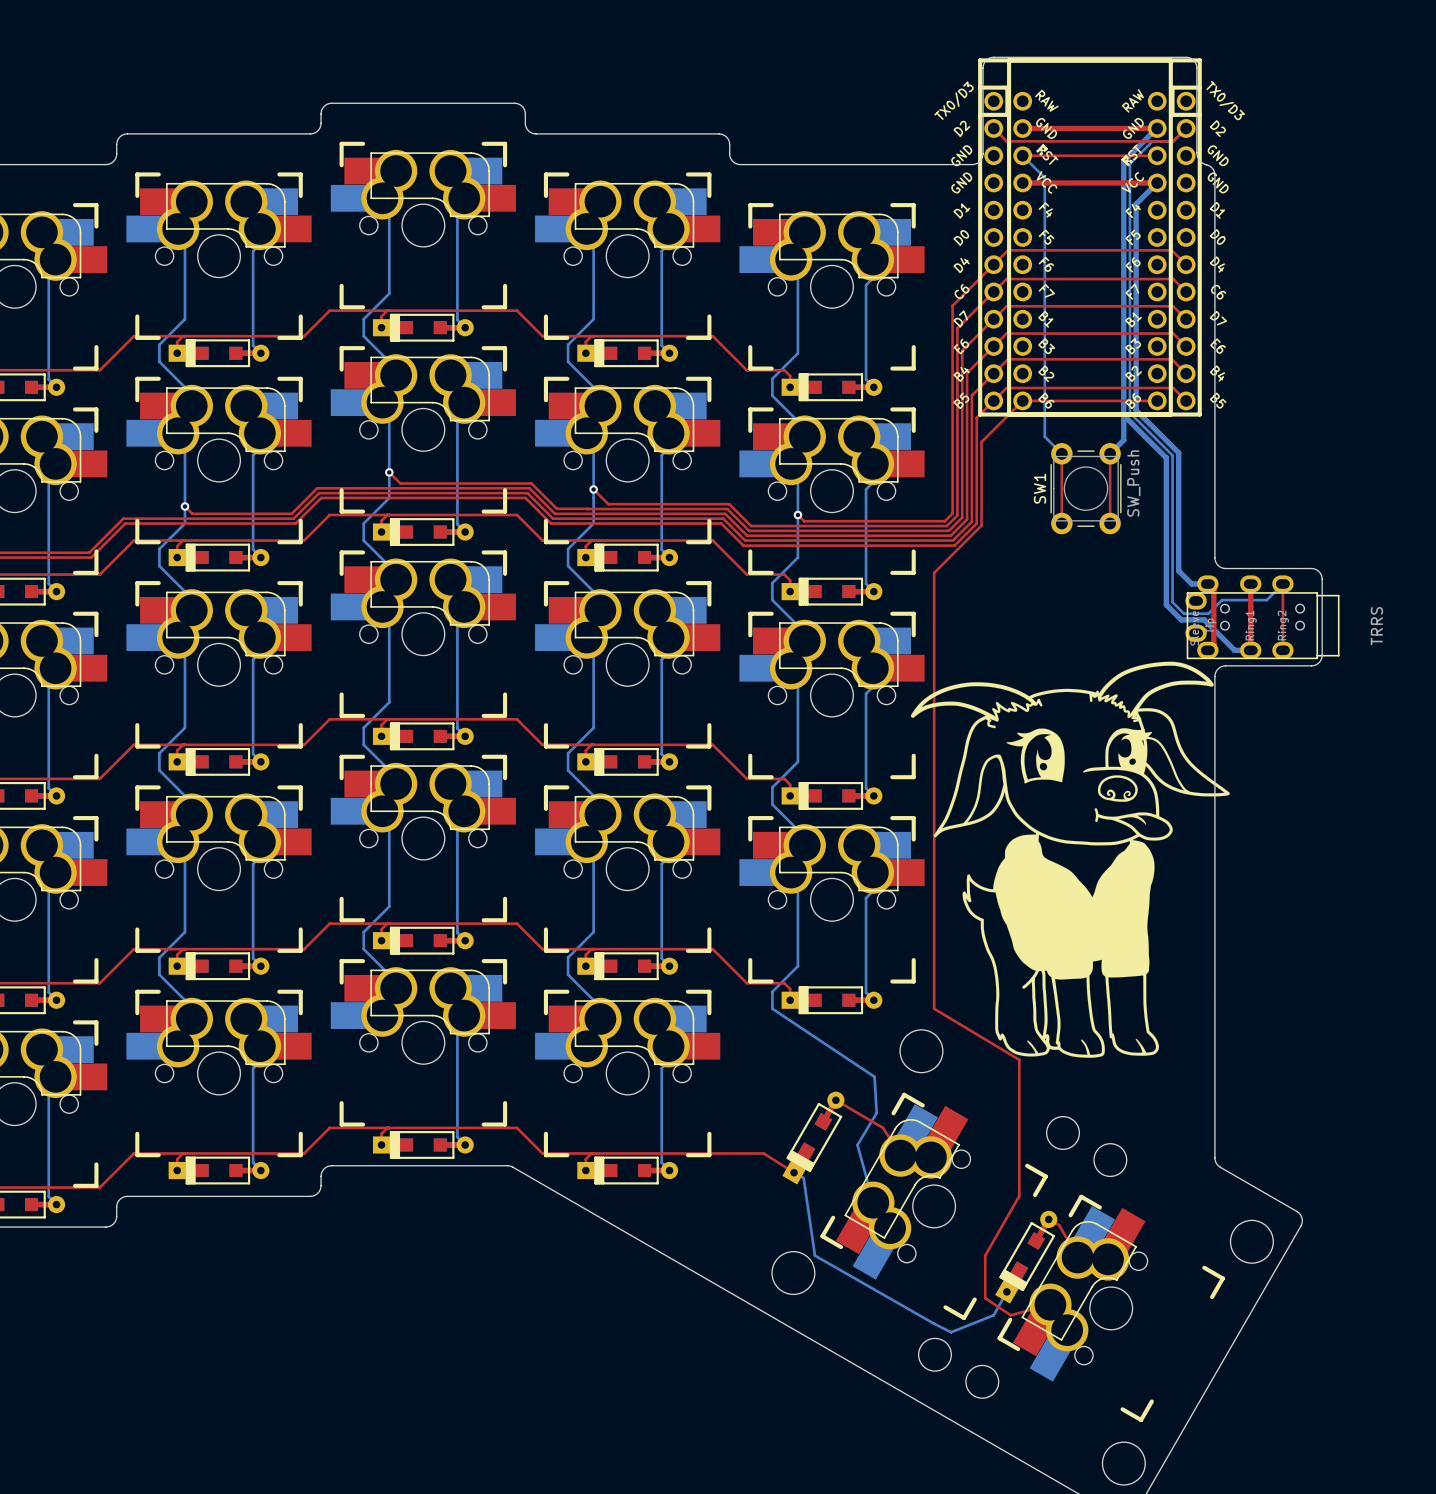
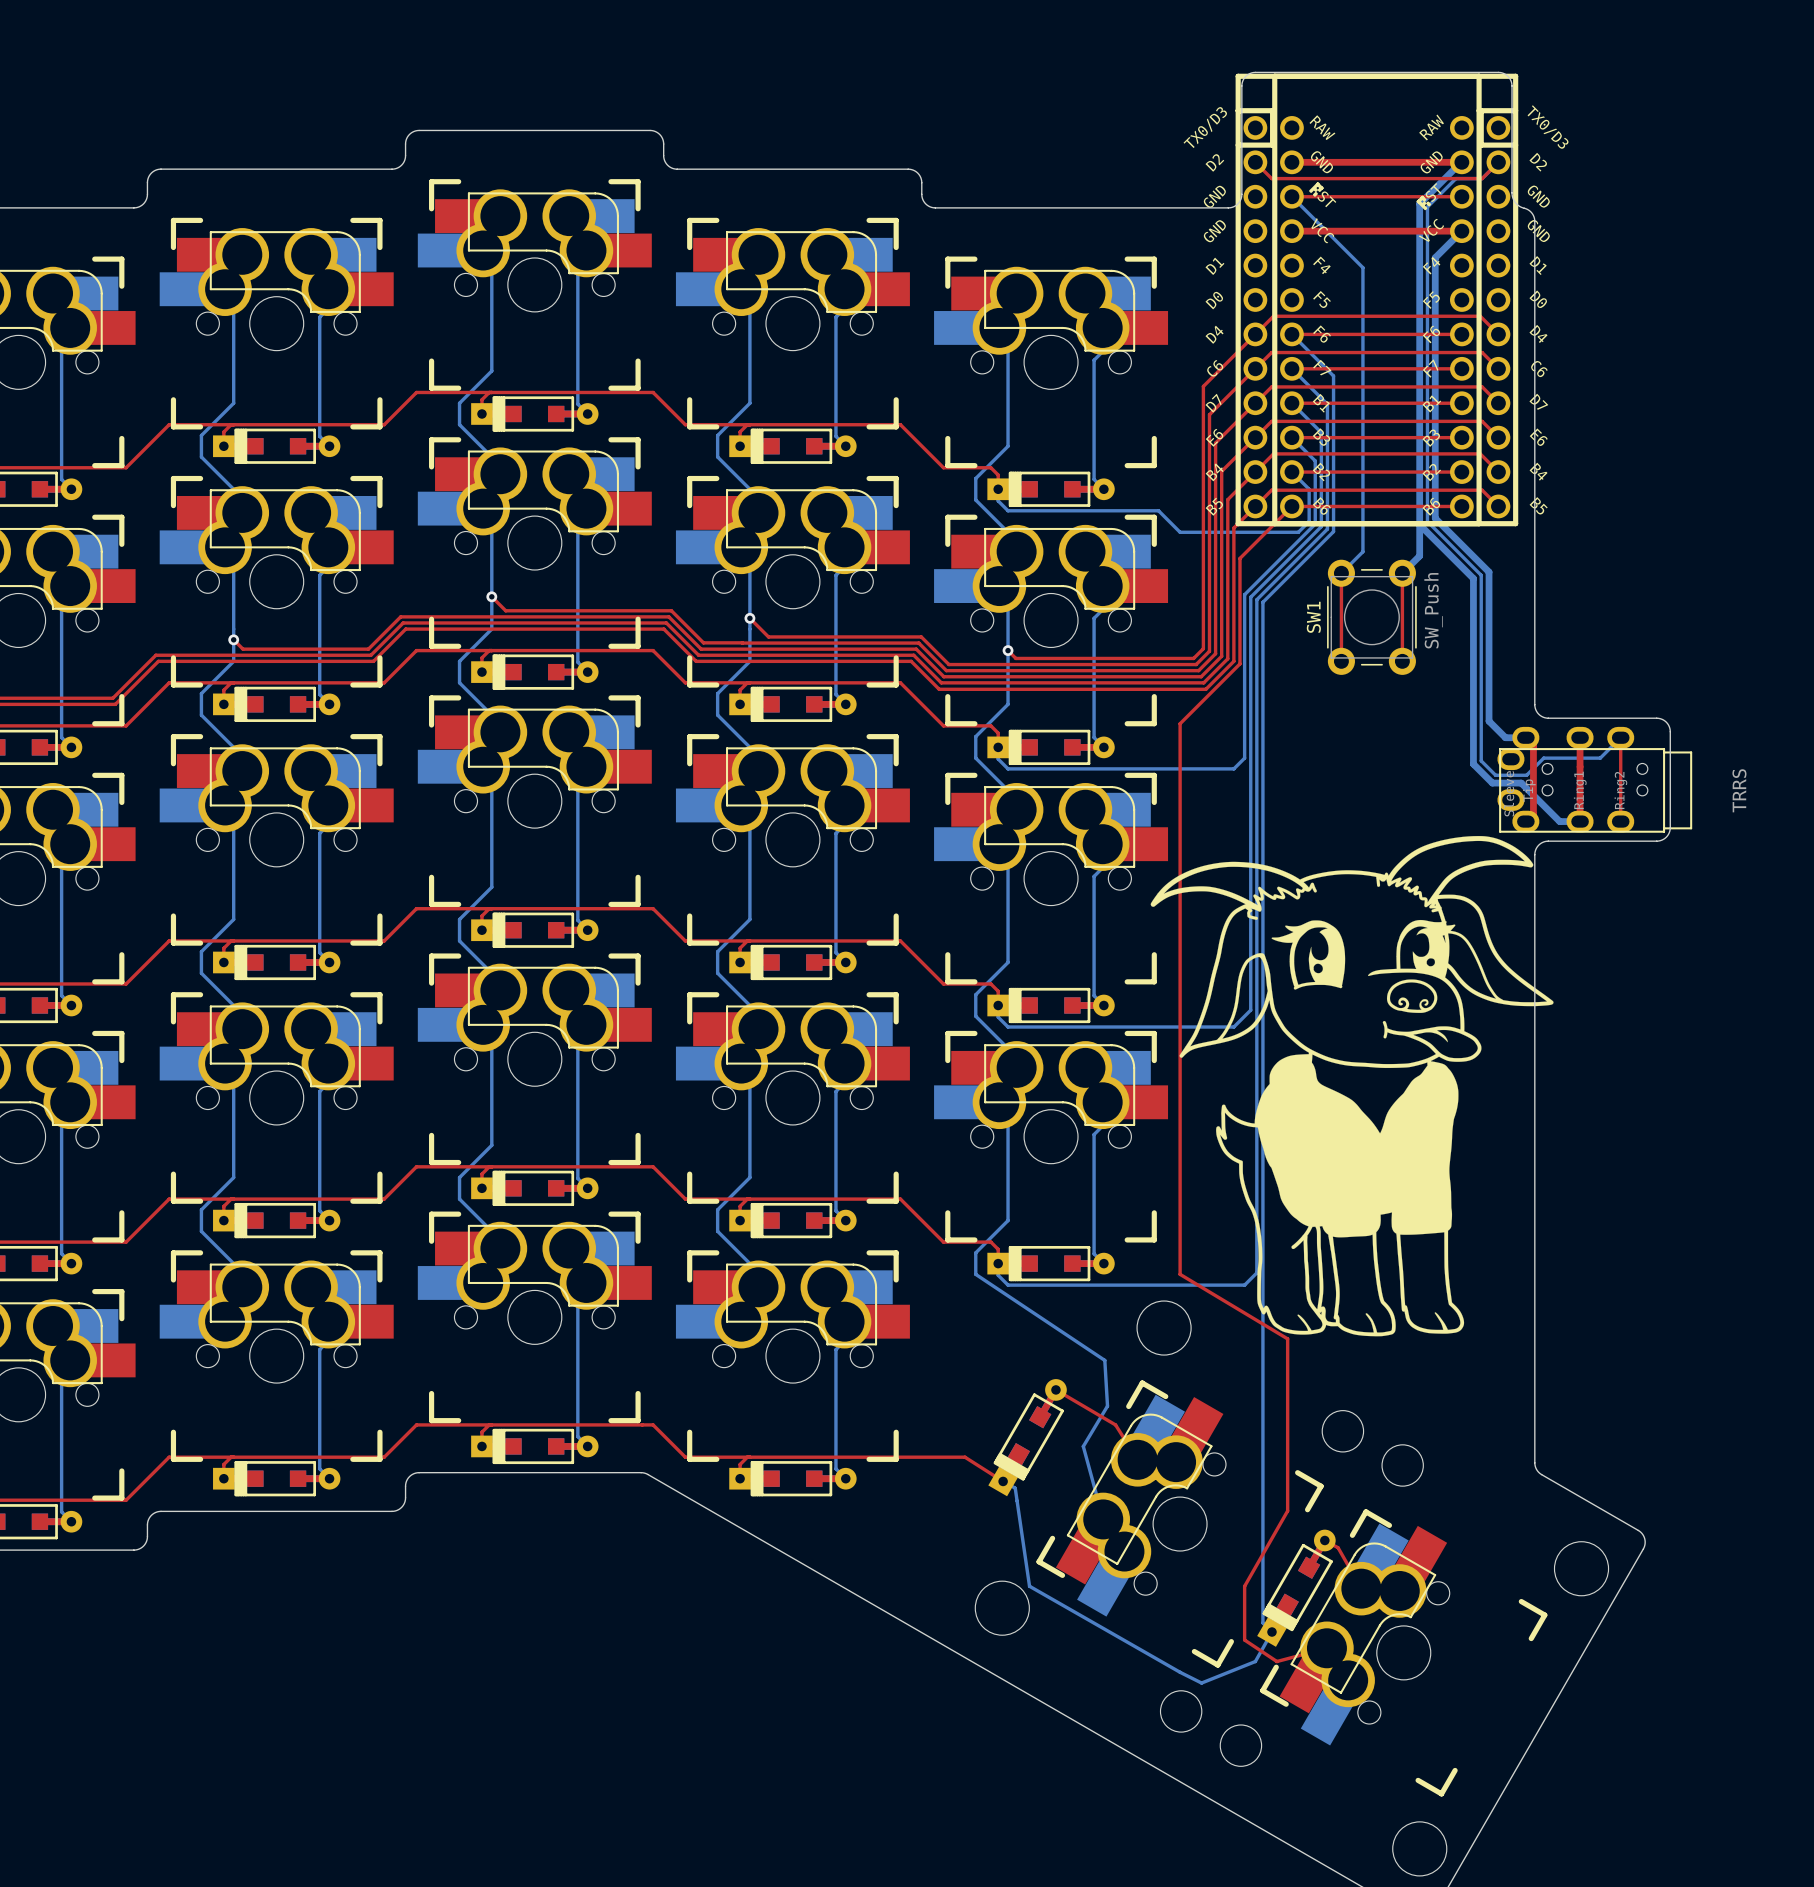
bottom track: (1044, 177) (1044, 436) (1061, 453) -> (1319, 224) (1362, 267) (1362, 551) (1341, 573)
top track: none -> (1291, 334) (1461, 334)
bottom track: none -> (1291, 334) (1333, 376) (1333, 531) (1262, 602) (1262, 1622) (1271, 1632)
top track: none -> (1291, 368) (1461, 368)
bottom track: none -> (1291, 368) (1327, 404) (1327, 529) (1256, 599) (1256, 1272) (1244, 1285) (1008, 1285) (998, 1275) (998, 1263)
top track: none -> (1291, 403) (1461, 403)
bottom track: none -> (1291, 403) (1321, 432) (1321, 526) (1250, 597) (1250, 1010) (1233, 1027) (1008, 1027) (998, 1017) (998, 1005)
top track: none -> (1291, 437) (1461, 437)
bottom track: none -> (1291, 437) (1315, 460) (1315, 524) (1244, 594) (1244, 758) (1233, 768) (1008, 768) (998, 759) (998, 747)
top track: none -> (1291, 472) (1461, 472)
bottom track: none -> (1291, 472) (1309, 489) (1309, 521) (1298, 532) (1180, 532) (1158, 510) (1008, 510) (998, 500) (998, 489)

